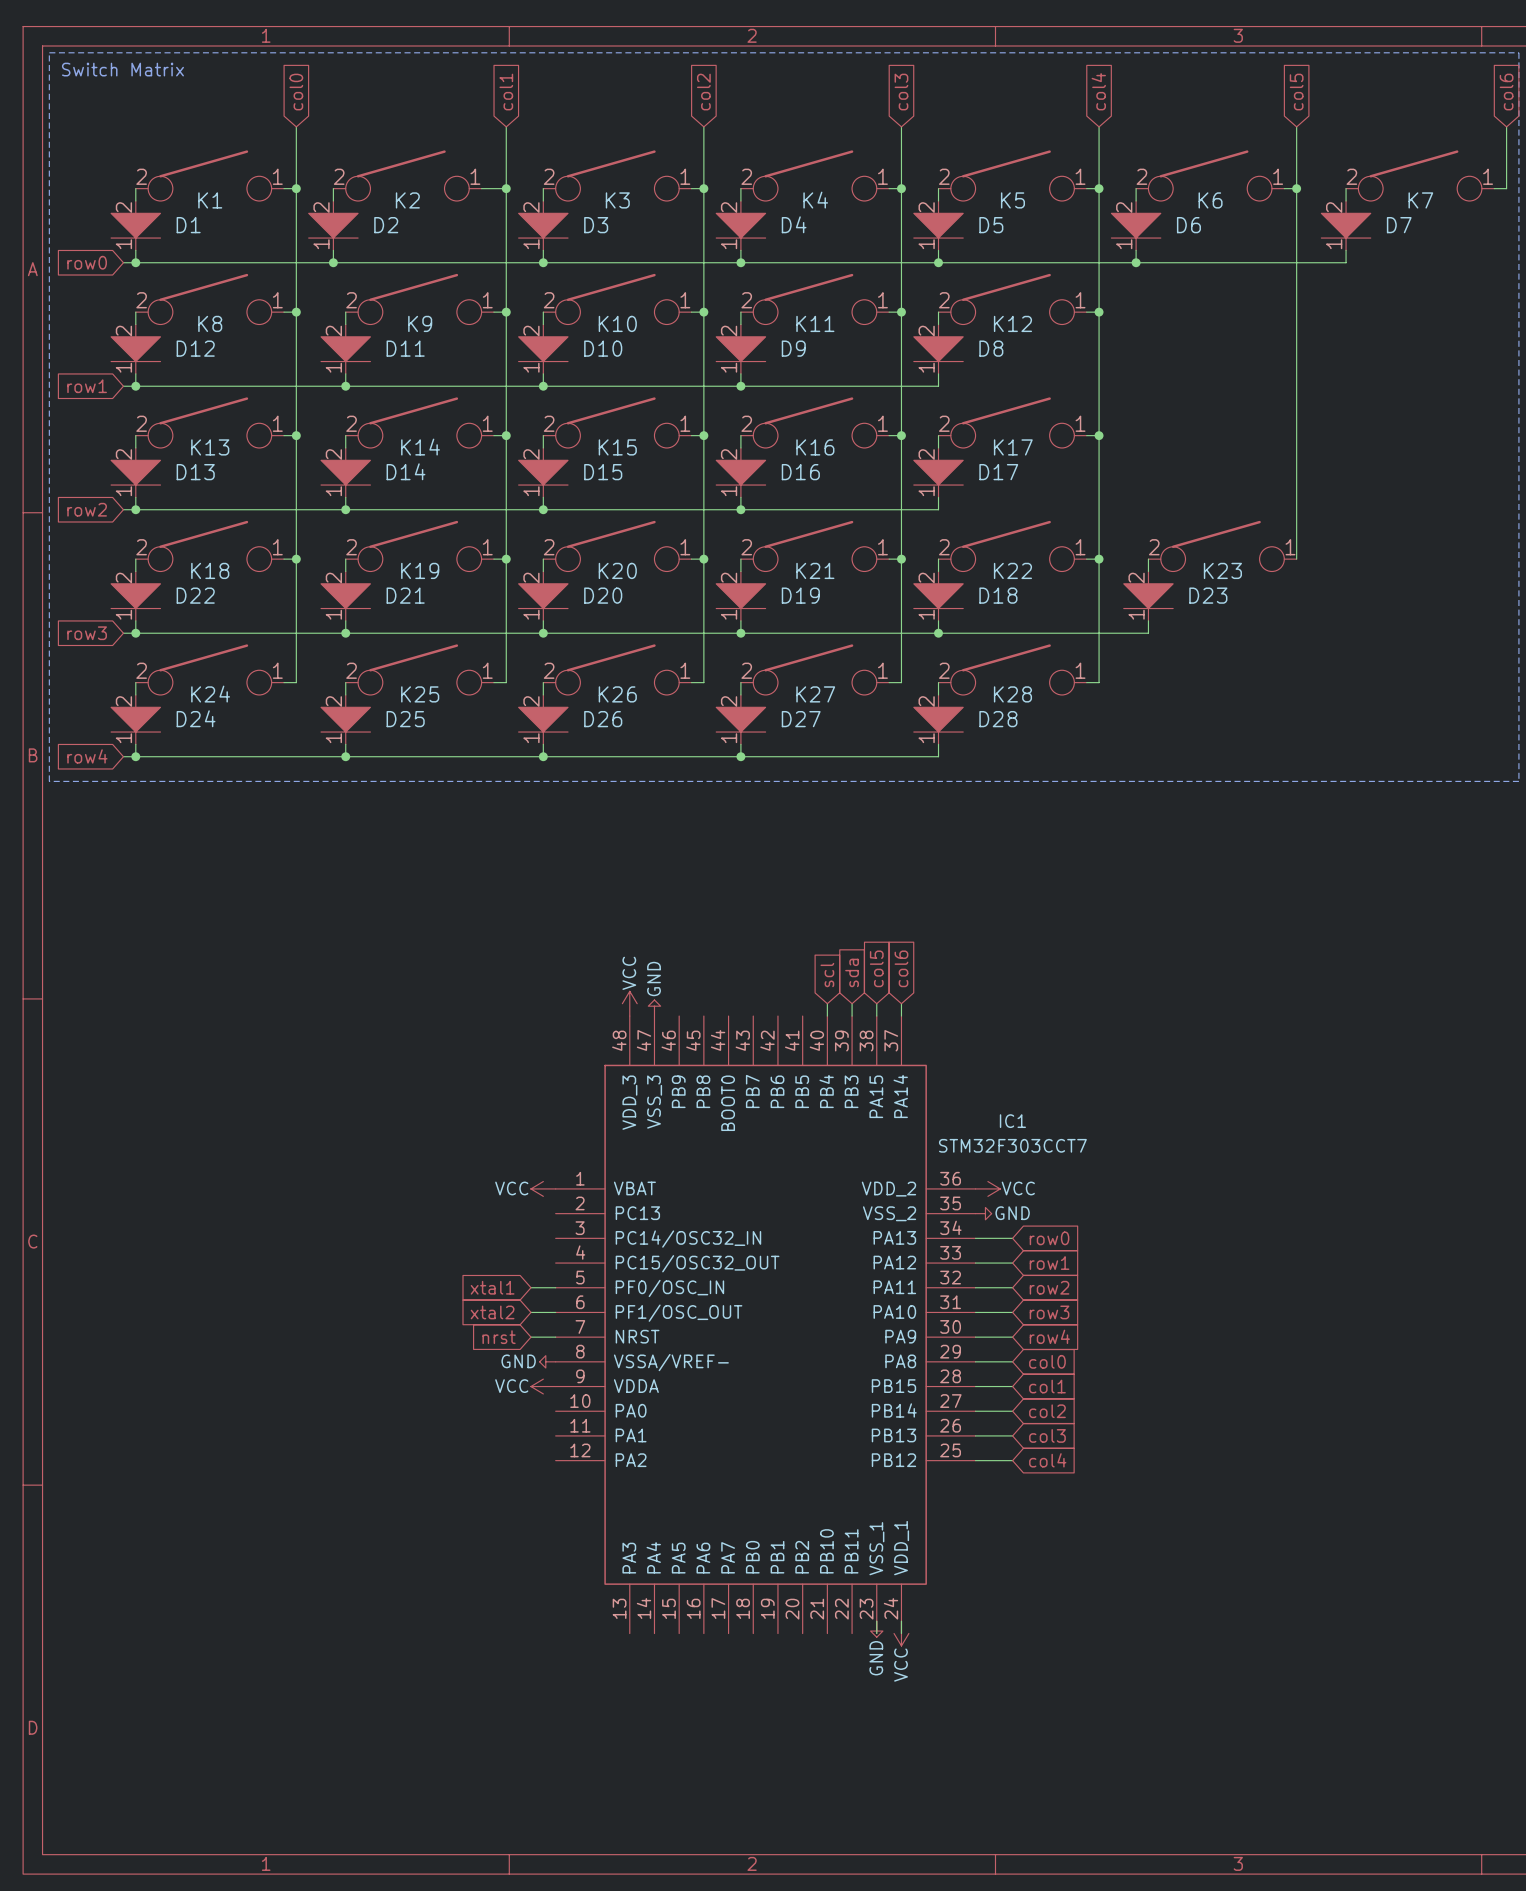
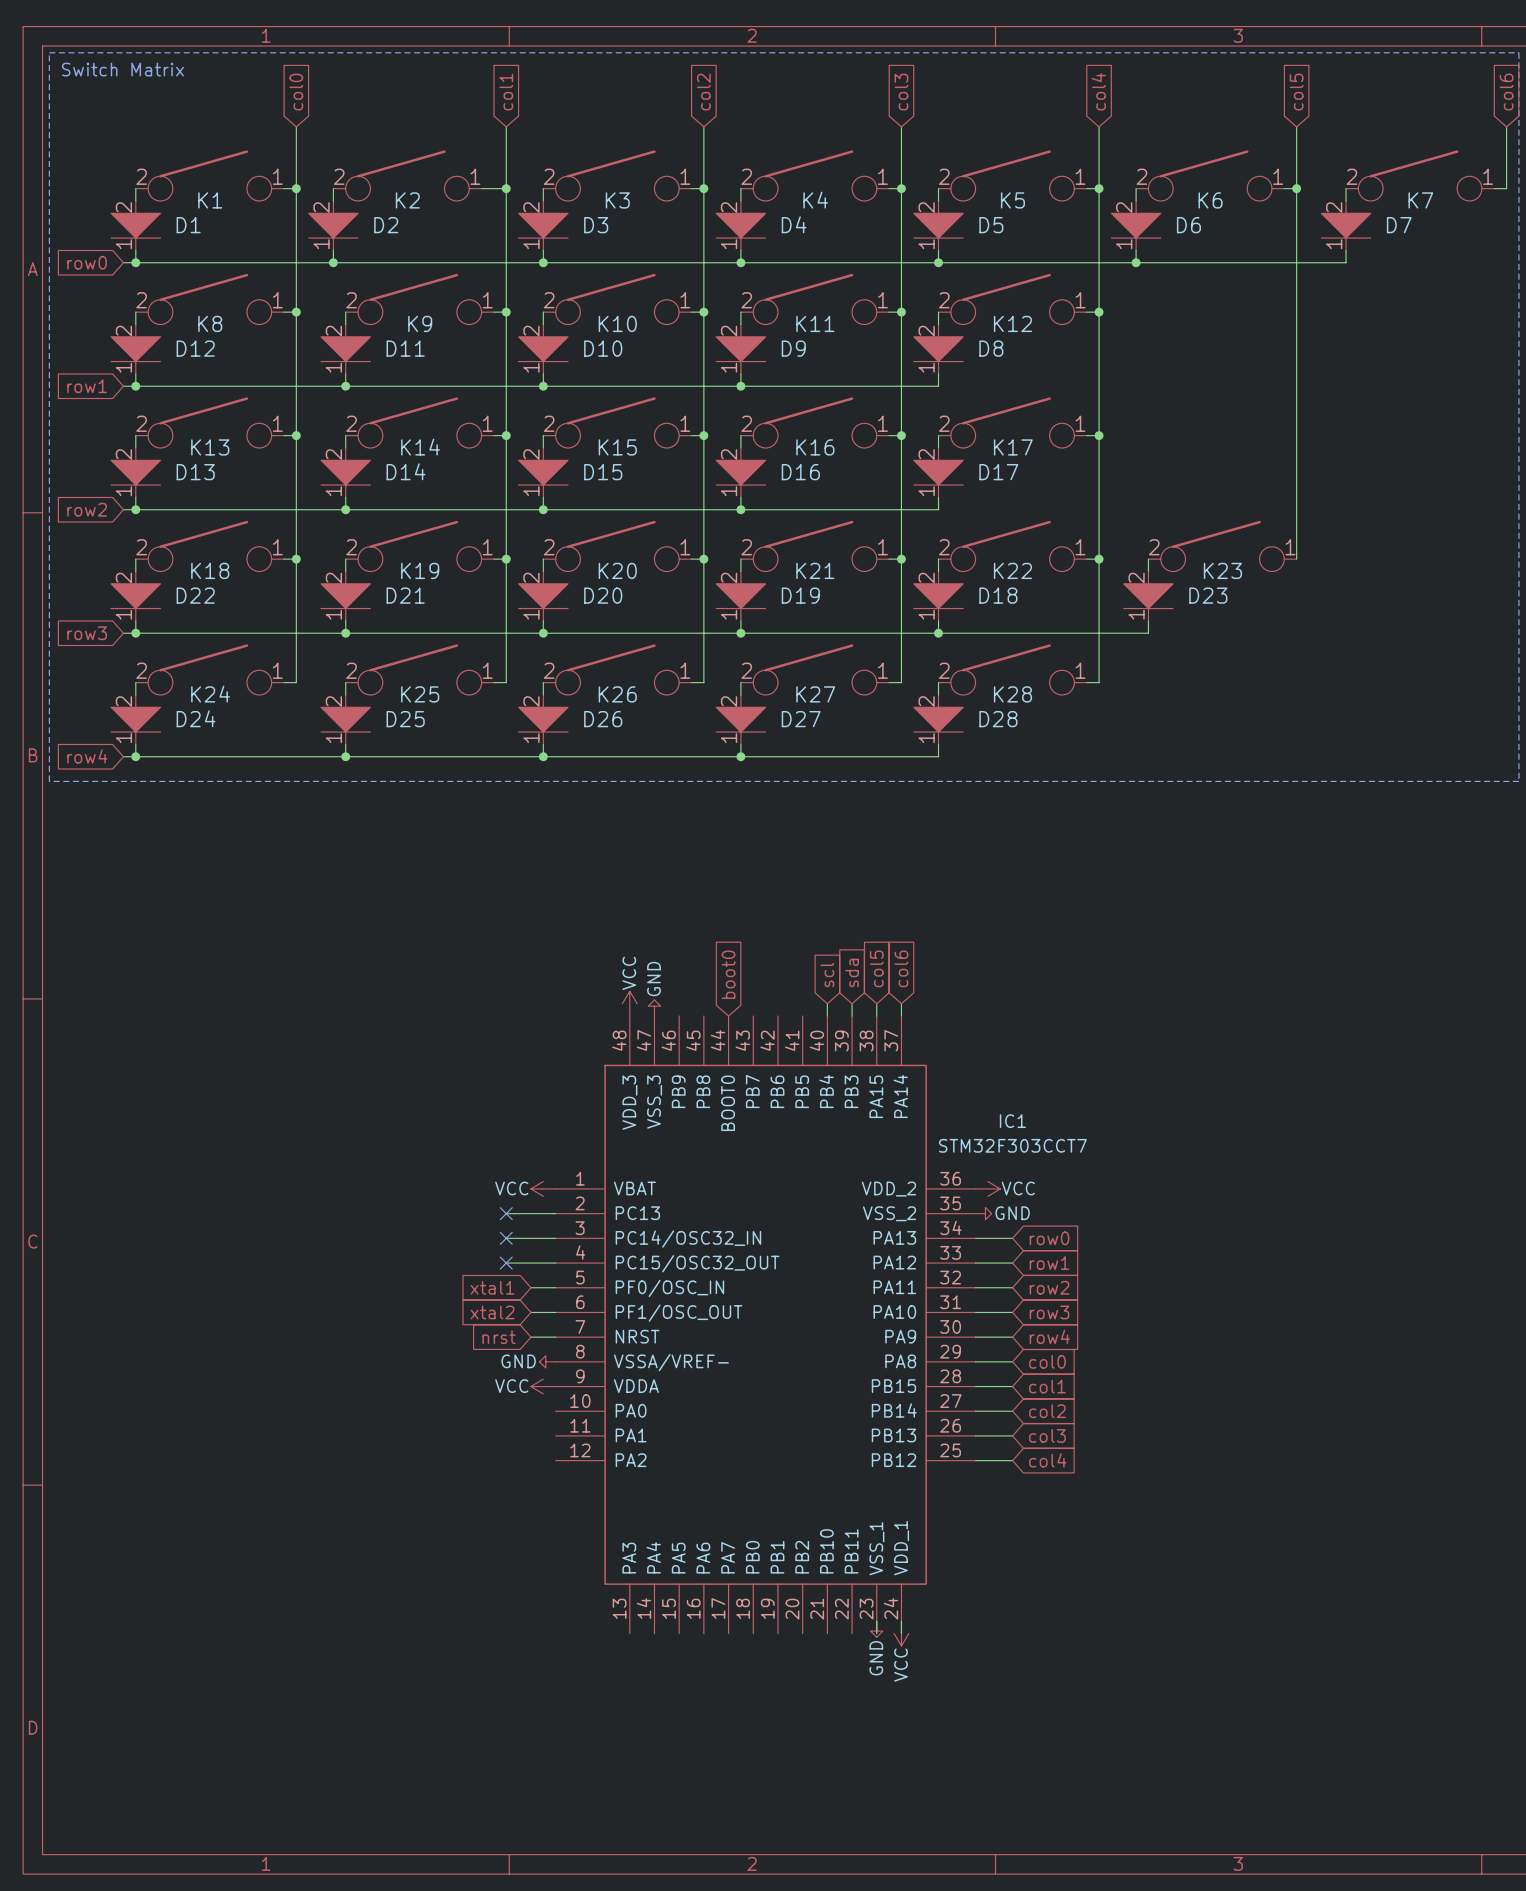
global label: none -> boot0 (728, 974)
wire: none -> (506, 1213) (555, 1213)
no-connect mark: none -> (506, 1213)
wire: none -> (506, 1238) (555, 1238)
no-connect mark: none -> (506, 1238)
wire: none -> (506, 1263) (555, 1263)
no-connect mark: none -> (506, 1263)

